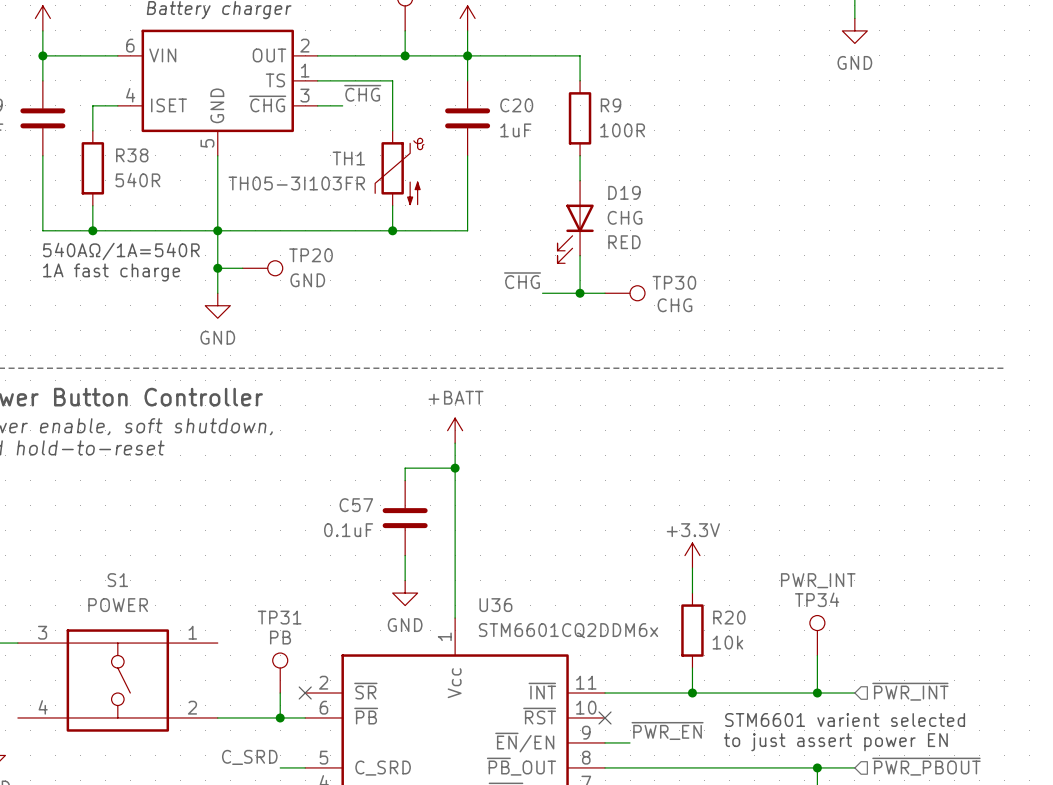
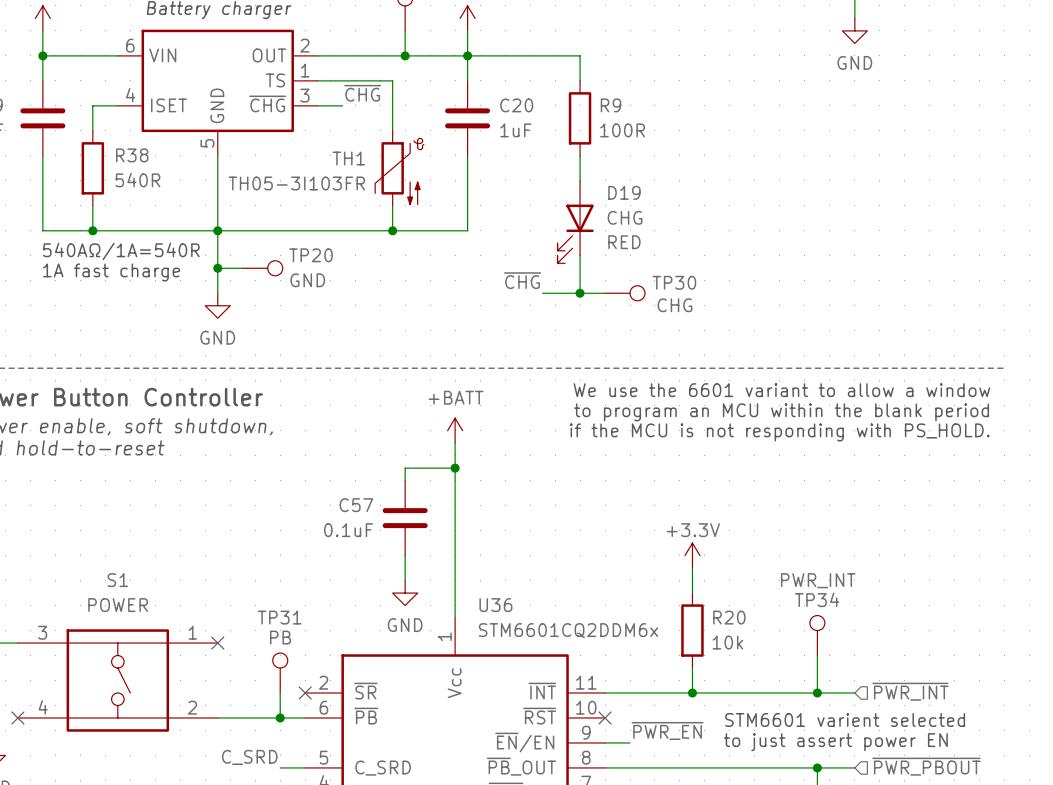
text: none -> We use the 6601 variant to allow a window (781, 390)
text: none -> to program an MCU within the blank period (781, 412)
text: none -> if the MCU is not responding with PS_HOLD. (779, 432)
no-connect mark: none -> (217, 643)
no-connect mark: none -> (17, 717)

